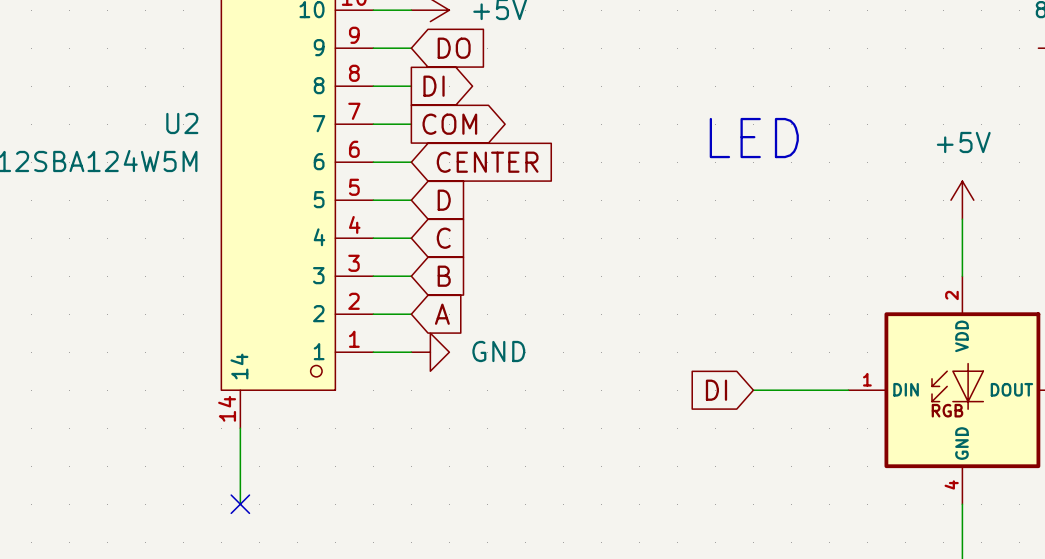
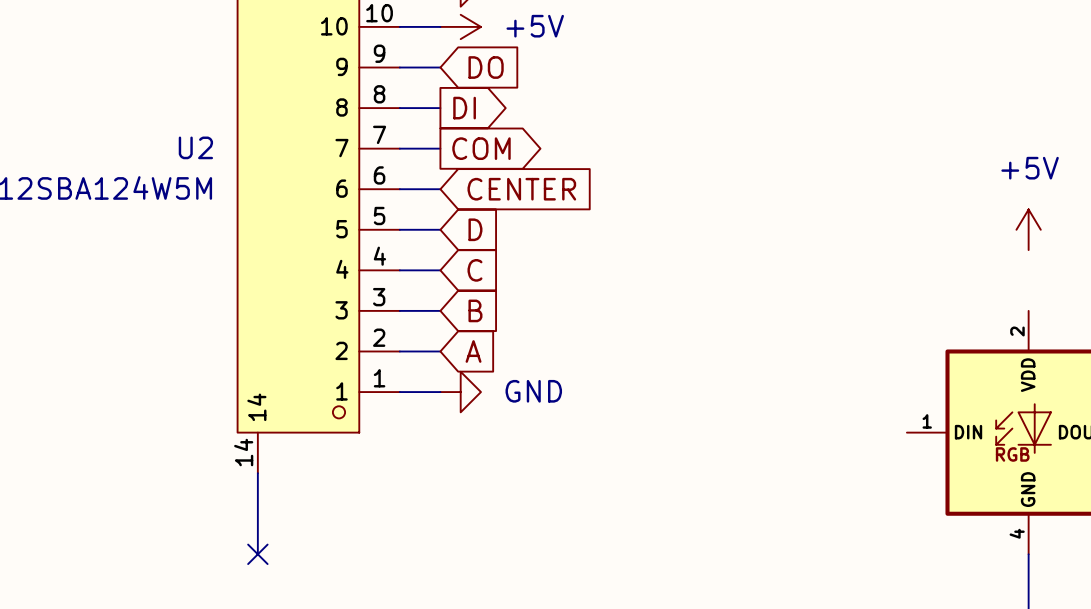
text: LED (754, 138) -> none
wire: (962, 219) (962, 276) -> none
global label: DI (716, 390) -> none
wire: (753, 390) (848, 390) -> none

